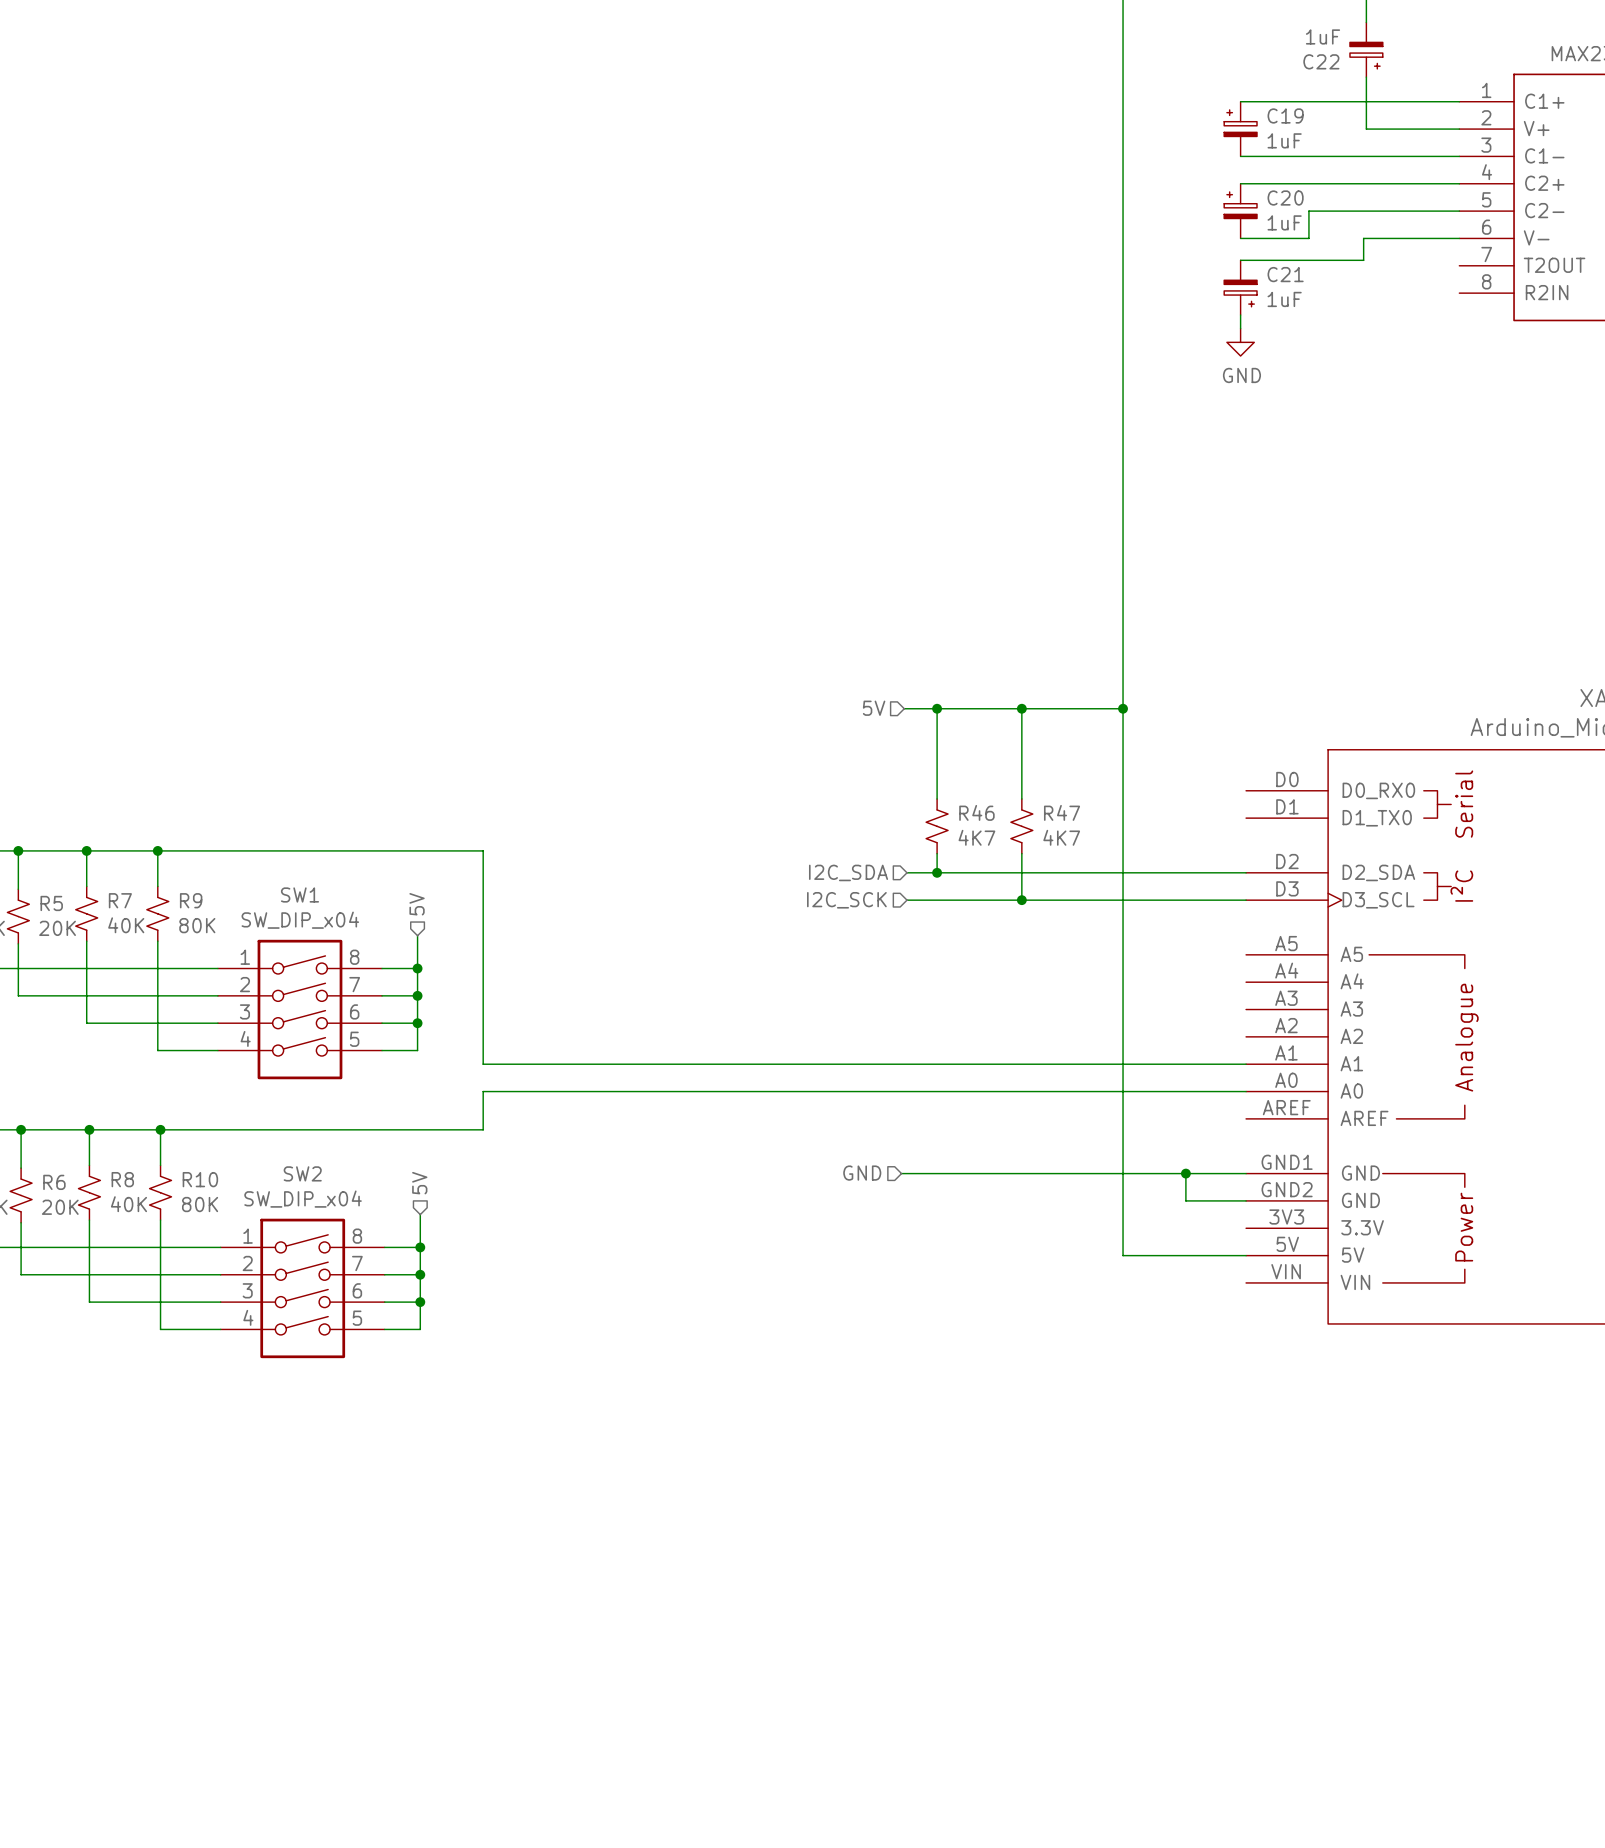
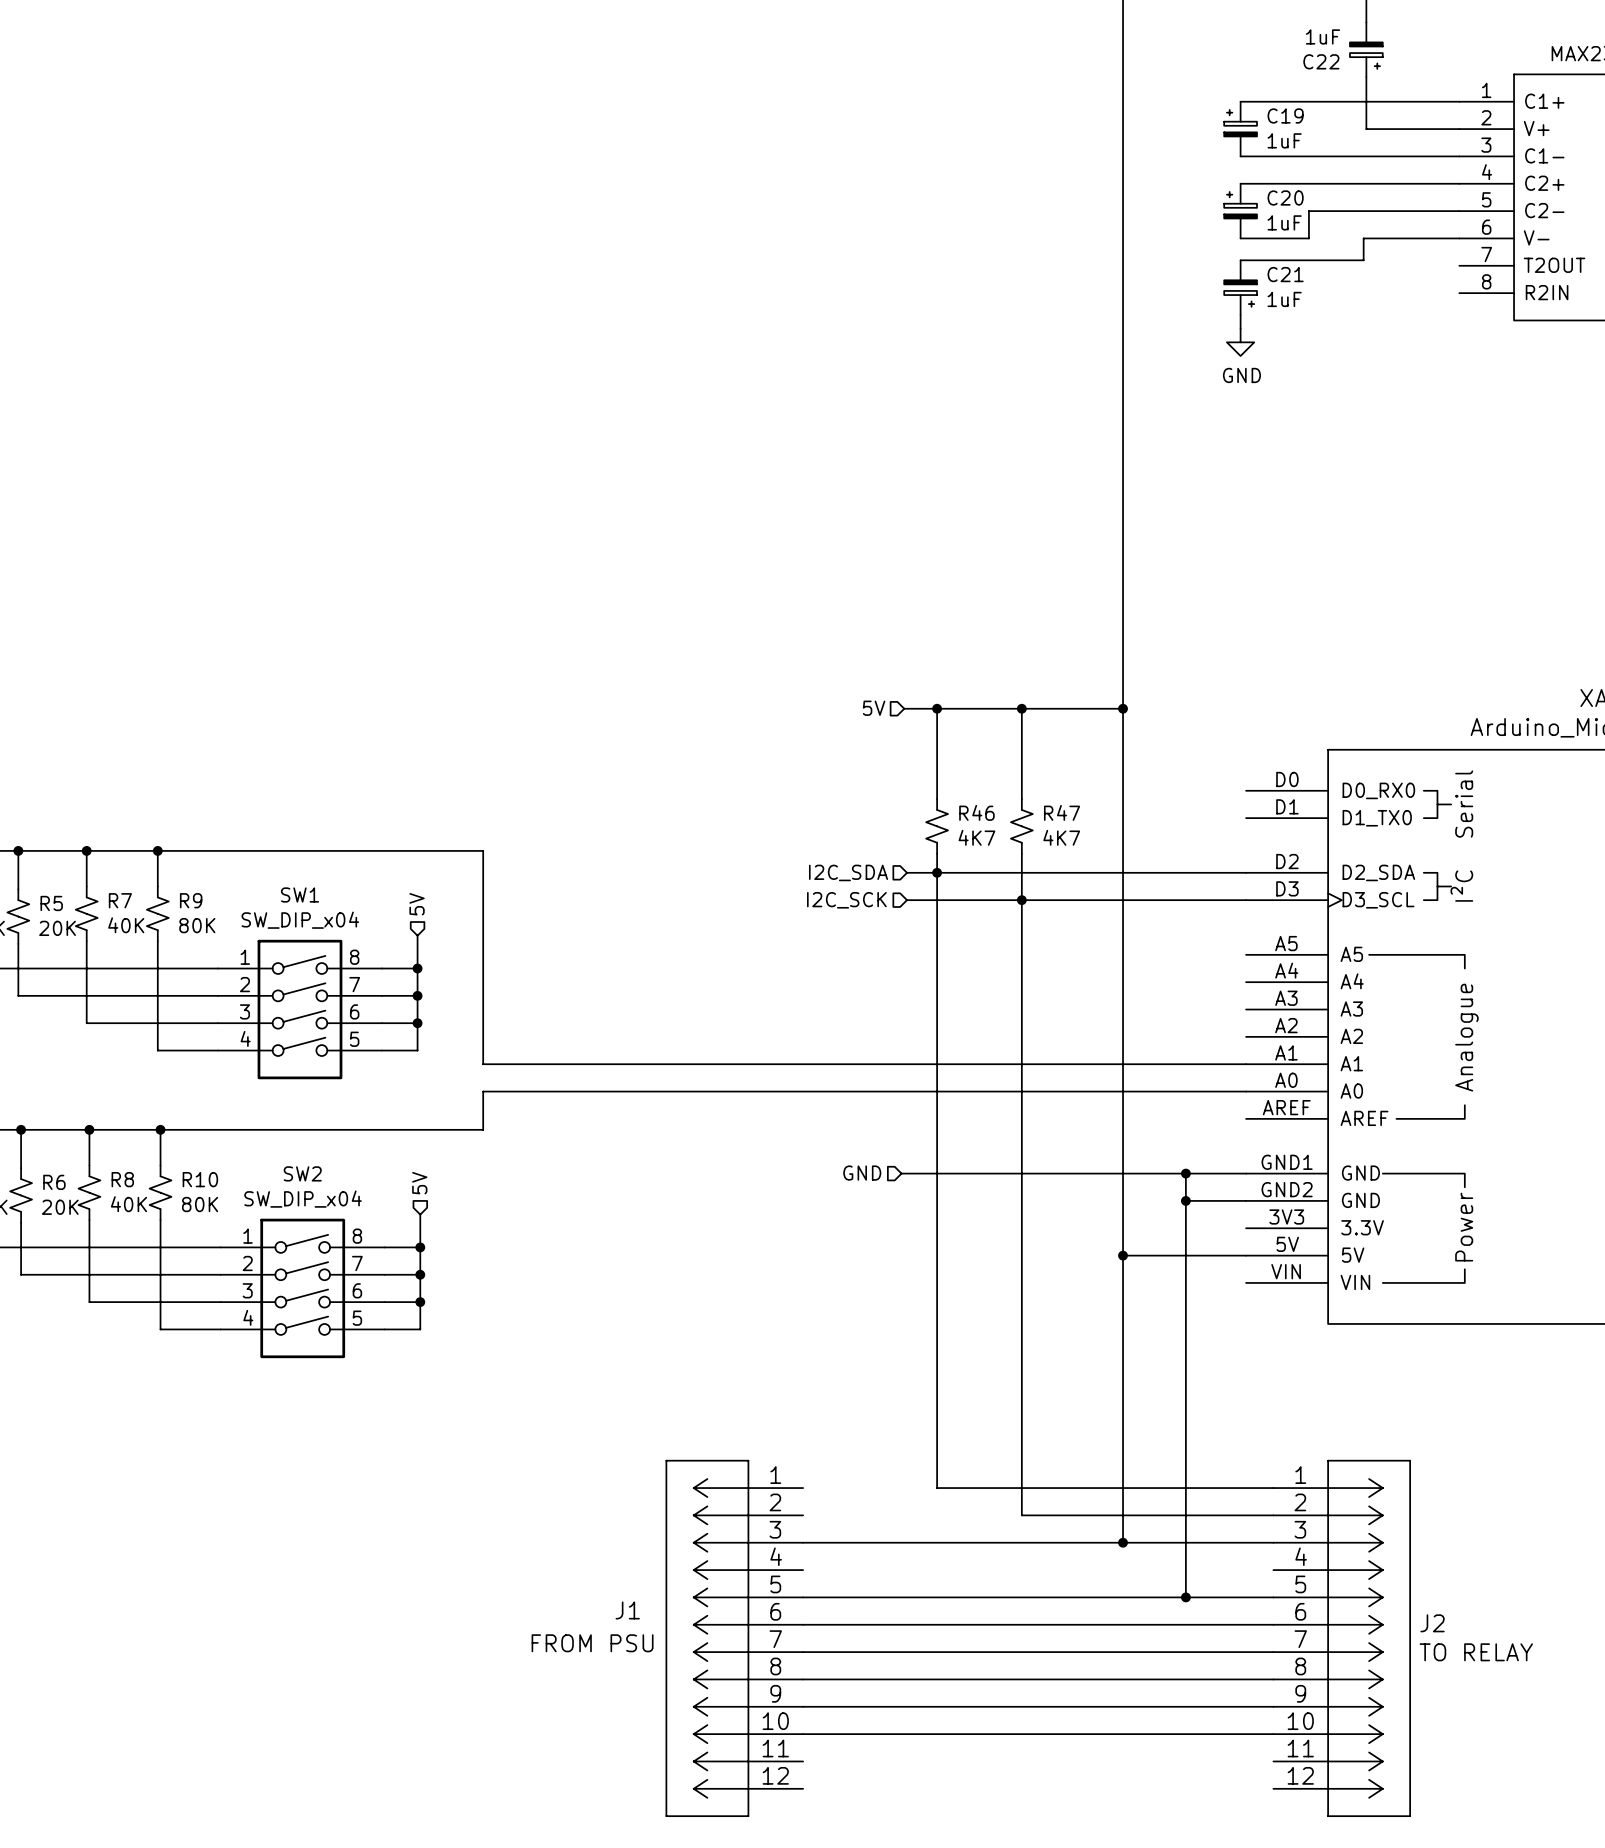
wire: none -> (937, 872) (937, 1488) (1273, 1488)
wire: none -> (1021, 900) (1021, 1515) (1273, 1515)
wire: none -> (1185, 1200) (1185, 1597)
junction: none -> (1185, 1200)
wire: none -> (1123, 1255) (1123, 1542)
junction: none -> (1123, 1255)
wire: none -> (803, 1542) (1273, 1542)
junction: none -> (1123, 1542)
wire: none -> (803, 1597) (1273, 1597)
junction: none -> (1185, 1597)
wire: none -> (803, 1624) (1273, 1624)
J1: none -> FROM PSU (734, 1638)
J2: none -> TO RELAY (1342, 1638)
wire: none -> (803, 1652) (1273, 1652)
wire: none -> (803, 1679) (1273, 1679)
wire: none -> (803, 1706) (1273, 1706)
wire: none -> (803, 1734) (1273, 1734)

